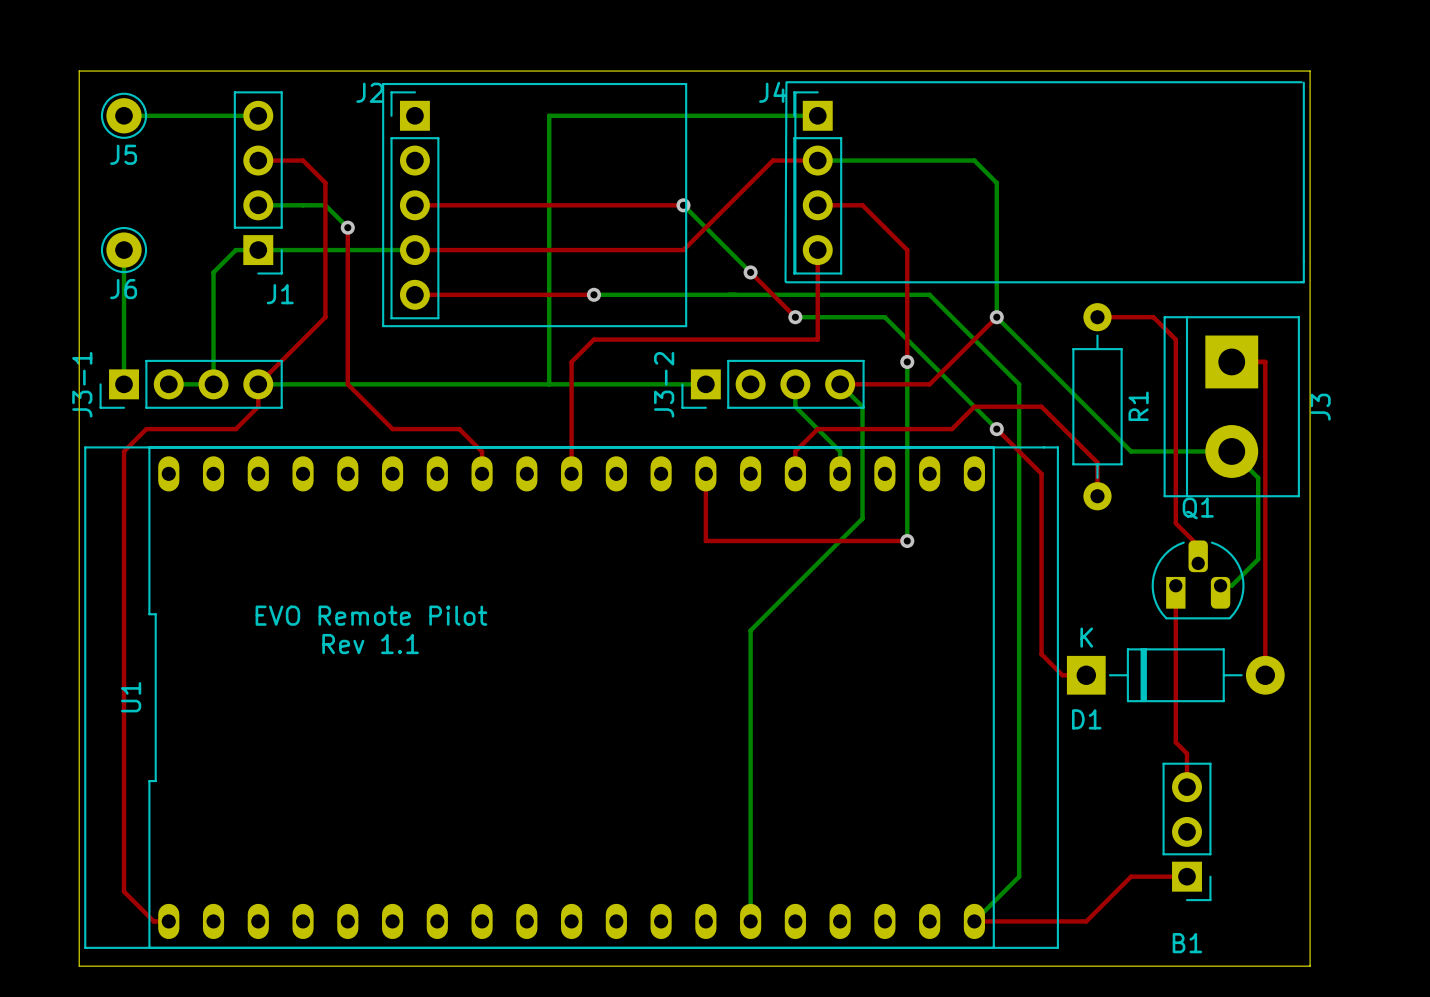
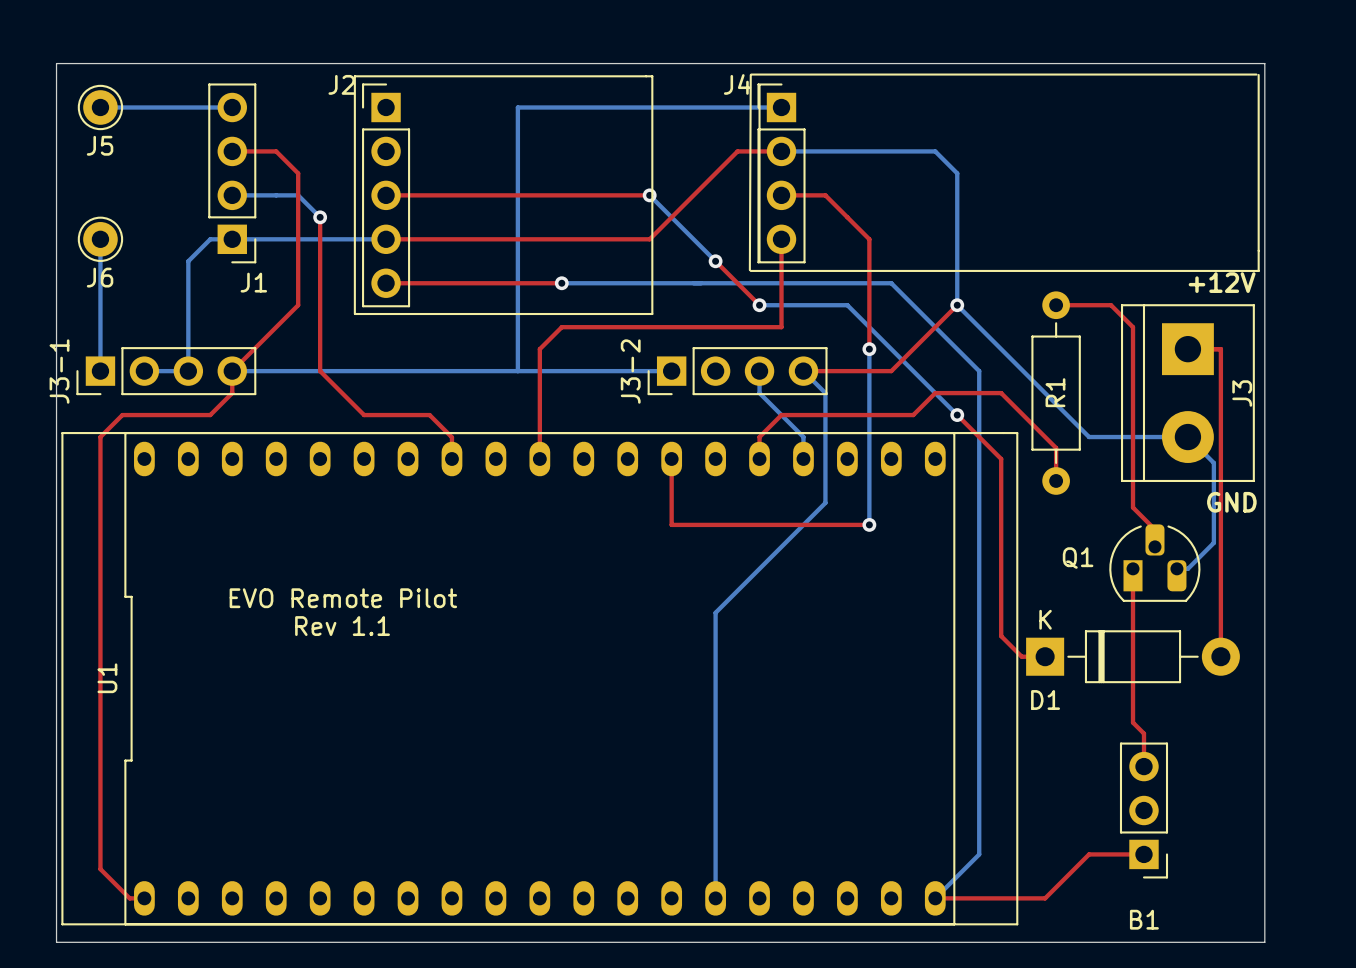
text: none -> +12V (1222, 282)
R1 name position: R1 (1138, 406) -> R1 (1055, 392)
J3 name position: J3 (1320, 407) -> J3 (1242, 393)
Q1 name position: Q1 (1198, 508) -> Q1 (1078, 558)
text: none -> GND (1231, 502)

